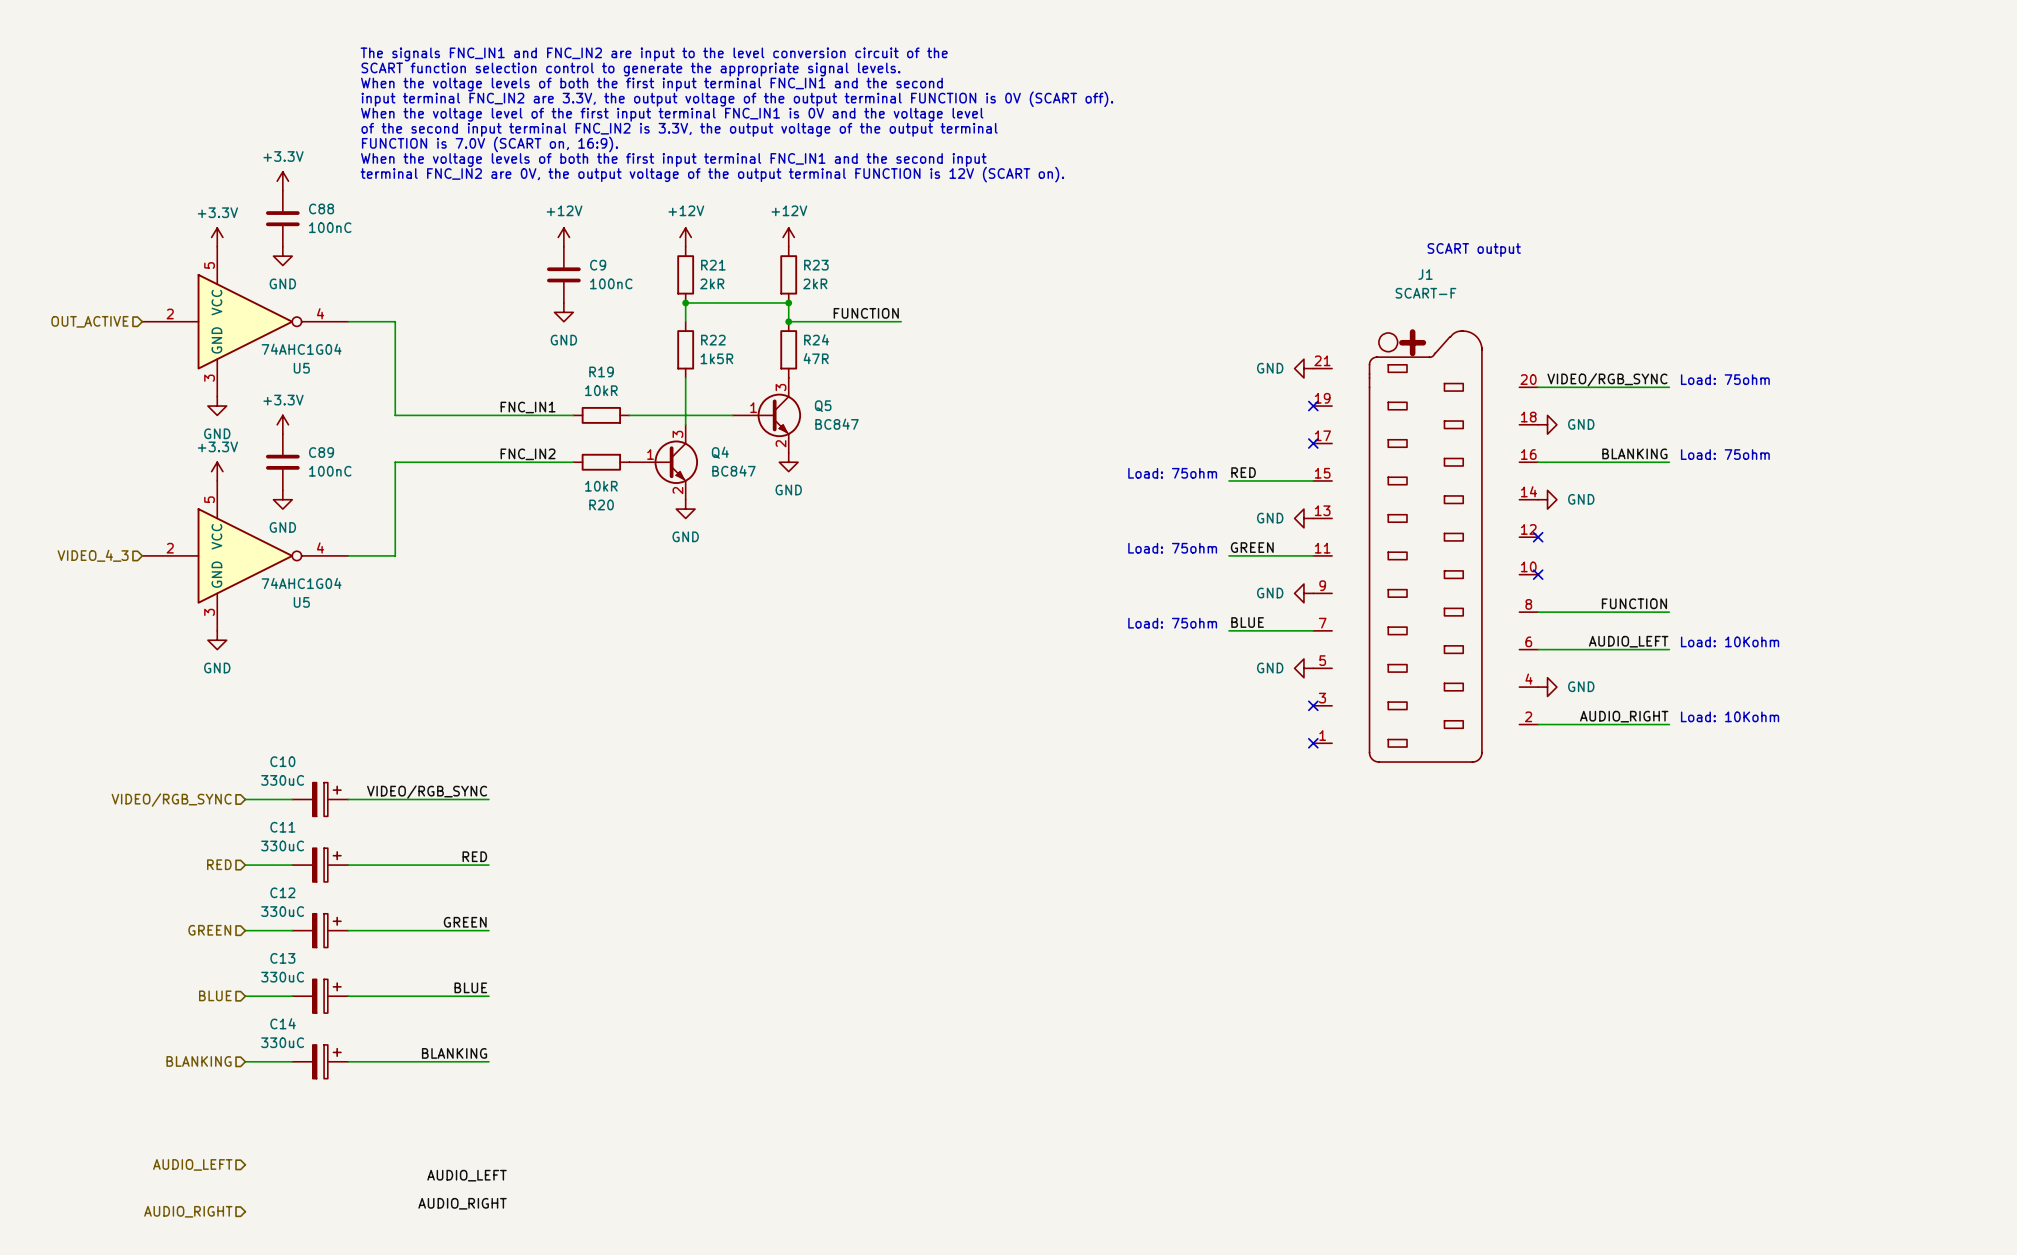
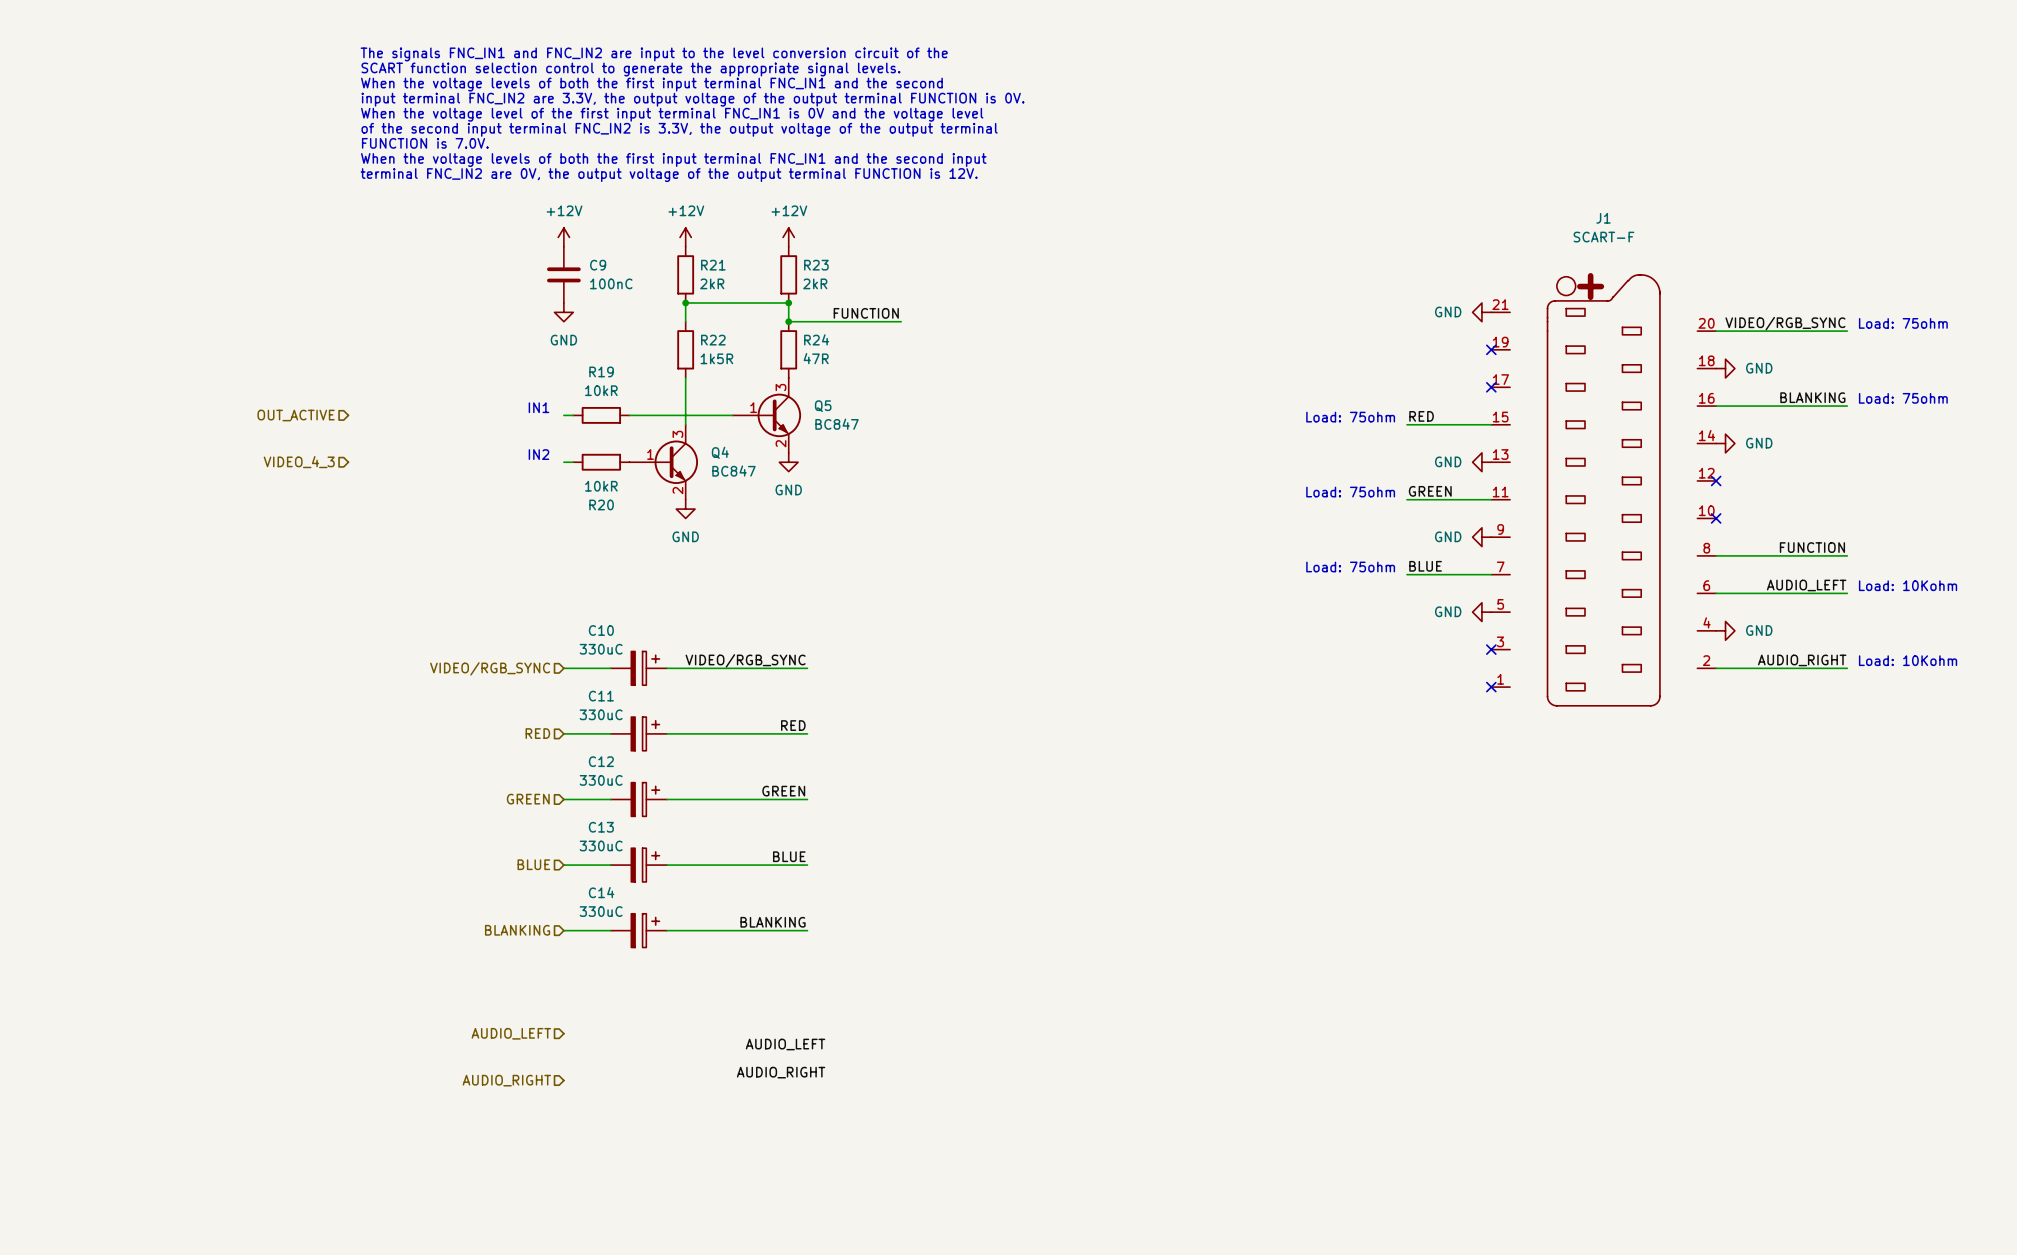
text: input terminal FNC_IN2 are 3.3V, the output voltage of the output terminal FUNCTION is 0V (SCART off). (737, 99) -> input terminal FNC_IN2 are 3.3V, the output voltage of the output terminal FUNCTION is 0V. (692, 99)
text: FUNCTION is 7.0V (SCART on, 16:9). (489, 144) -> FUNCTION is 7.0V. (425, 143)
text: terminal FNC_IN2 are 0V, the output voltage of the output terminal FUNCTION is 12V (SCART on). (712, 174) -> terminal FNC_IN2 are 0V, the output voltage of the output terminal FUNCTION is 12V. (669, 175)
power symbol: +3.3V (282, 181) -> none
C88: 100nC (282, 218) -> none
power symbol: +3.3V (217, 237) -> none
text: SCART output (1474, 250) -> none
power symbol: GND (282, 256) -> none
power symbol: none -> GND (1481, 312)
hierarchical label: OUT_ACTIVE (89, 321) -> none
U5: 74AHC1G04 (245, 321) -> none
wire: (348, 321) (395, 321) (395, 415) (563, 415) -> none
label: none -> VIDEO/RGB_SYNC (1785, 323)
text: none -> Load: 75ohm (1903, 323)
wire: none -> (1716, 331) (1847, 331)
no-connect mark: none -> (1491, 349)
power symbol: GND (1303, 368) -> none
power symbol: none -> GND (1725, 368)
label: VIDEO/RGB_SYNC (1607, 379) -> none
text: Load: 75ohm (1725, 379) -> none
no-connect mark: none -> (1491, 387)
wire: (1538, 387) (1669, 387) -> (1716, 406) (1847, 406)
label: none -> BLANKING (1812, 397)
text: none -> Load: 75ohm (1903, 398)
power symbol: GND (217, 406) -> none
no-connect mark: (1313, 406) -> none
label: FNC_IN1 (528, 407) -> none
text: none -> IN1 (538, 407)
hierarchical label: none -> OUT_ACTIVE (296, 415)
label: none -> RED (1421, 416)
text: none -> Load: 75ohm (1350, 417)
power symbol: +3.3V (282, 424) -> none
wire: none -> (1407, 424) (1491, 424)
power symbol: GND (1547, 424) -> none
no-connect mark: (1313, 443) -> none
power symbol: none -> GND (1725, 443)
label: BLANKING (1634, 453) -> none
label: FNC_IN2 (528, 454) -> none
text: none -> IN2 (538, 454)
text: Load: 75ohm (1725, 454) -> none
C89: 100nC (282, 462) -> none
hierarchical label: none -> VIDEO_4_3 (299, 462)
wire: (563, 462) (395, 462) (395, 555) (348, 555) -> none
power symbol: none -> GND (1481, 462)
wire: (1538, 462) (1669, 462) -> none
power symbol: +3.3V (217, 471) -> none
label: RED (1243, 472) -> none
text: Load: 75ohm (1172, 473) -> none
wire: (1229, 480) (1313, 480) -> (1407, 499) (1491, 499)
no-connect mark: none -> (1716, 480)
label: none -> GREEN (1430, 491)
text: none -> Load: 75ohm (1350, 492)
power symbol: GND (282, 499) -> none
power symbol: GND (1547, 499) -> none
power symbol: GND (1303, 518) -> none
no-connect mark: none -> (1716, 518)
power symbol: none -> GND (1481, 537)
no-connect mark: (1538, 537) -> none
J1 position: (1425, 546) -> (1603, 490)
label: GREEN (1252, 547) -> none
label: none -> FUNCTION (1812, 547)
text: Load: 75ohm (1172, 548) -> none
hierarchical label: VIDEO_4_3 (93, 555) -> none
U5: 74AHC1G04 (245, 555) -> none
wire: (1229, 555) (1313, 555) -> (1407, 574) (1491, 574)
wire: none -> (1716, 555) (1847, 555)
text: none -> Load: 75ohm (1350, 566)
label: none -> BLUE (1425, 566)
no-connect mark: (1538, 574) -> none
label: none -> AUDIO_LEFT (1806, 585)
text: none -> Load: 10Kohm (1908, 585)
power symbol: GND (1303, 593) -> none
label: FUNCTION (1634, 603) -> none
power symbol: none -> GND (1481, 612)
wire: (1538, 612) (1669, 612) -> (1716, 593) (1847, 593)
label: BLUE (1247, 622) -> none
text: Load: 75ohm (1172, 623) -> none
wire: (1229, 630) (1313, 630) -> none
power symbol: none -> GND (1725, 630)
power symbol: GND (217, 640) -> none
label: AUDIO_LEFT (1628, 641) -> none
text: Load: 10Kohm (1730, 641) -> none
no-connect mark: none -> (1491, 649)
wire: (1538, 649) (1669, 649) -> (1716, 668) (1847, 668)
label: none -> VIDEO/RGB_SYNC (745, 660)
label: none -> AUDIO_RIGHT (1802, 660)
text: none -> Load: 10Kohm (1908, 660)
hierarchical label: none -> VIDEO/RGB_SYNC (490, 668)
wire: none -> (563, 668) (610, 668)
wire: none -> (666, 668) (807, 668)
power symbol: GND (1303, 668) -> none
no-connect mark: none -> (1491, 687)
power symbol: GND (1547, 687) -> none
no-connect mark: (1313, 705) -> none
label: AUDIO_RIGHT (1624, 716) -> none
text: Load: 10Kohm (1730, 716) -> none
wire: (1538, 724) (1669, 724) -> none
label: none -> RED (793, 725)
hierarchical label: none -> RED (537, 733)
wire: none -> (563, 733) (610, 733)
wire: none -> (666, 733) (807, 733)
no-connect mark: (1313, 743) -> none
label: none -> GREEN (783, 791)
label: VIDEO/RGB_SYNC (427, 792) -> none
wire: (245, 799) (292, 799) -> none
C10 position: (320, 799) -> (638, 668)
wire: (348, 799) (488, 799) -> none
hierarchical label: none -> GREEN (528, 799)
wire: none -> (563, 799) (610, 799)
wire: none -> (666, 799) (807, 799)
hierarchical label: VIDEO/RGB_SYNC (171, 800) -> none
label: RED (474, 856) -> none
label: none -> BLUE (789, 856)
hierarchical label: RED (219, 864) -> none
hierarchical label: none -> BLUE (533, 864)
wire: (245, 865) (292, 865) -> none
C11 position: (320, 865) -> (638, 733)
wire: (348, 865) (488, 865) -> none
wire: none -> (563, 865) (610, 865)
wire: none -> (666, 865) (807, 865)
label: GREEN (465, 922) -> none
label: none -> BLANKING (773, 922)
hierarchical label: GREEN (209, 930) -> none
wire: (245, 930) (292, 930) -> none
C12 position: (320, 930) -> (638, 799)
wire: (348, 930) (488, 930) -> none
hierarchical label: none -> BLANKING (517, 930)
wire: none -> (563, 930) (610, 930)
wire: none -> (666, 930) (807, 930)
label: BLUE (470, 987) -> none
hierarchical label: BLUE (215, 995) -> none
wire: (245, 996) (292, 996) -> none
C13 position: (320, 996) -> (638, 865)
wire: (348, 996) (488, 996) -> none
hierarchical label: none -> AUDIO_LEFT (511, 1033)
label: none -> AUDIO_LEFT (785, 1044)
label: BLANKING (454, 1053) -> none
hierarchical label: BLANKING (199, 1061) -> none
wire: (245, 1061) (292, 1061) -> none
C14 position: (320, 1061) -> (638, 930)
wire: (348, 1061) (488, 1061) -> none
label: none -> AUDIO_RIGHT (781, 1072)
hierarchical label: none -> AUDIO_RIGHT (506, 1080)
hierarchical label: AUDIO_LEFT (192, 1164) -> none
label: AUDIO_LEFT (467, 1175) -> none
label: AUDIO_RIGHT (462, 1203) -> none
hierarchical label: AUDIO_RIGHT (188, 1211) -> none

